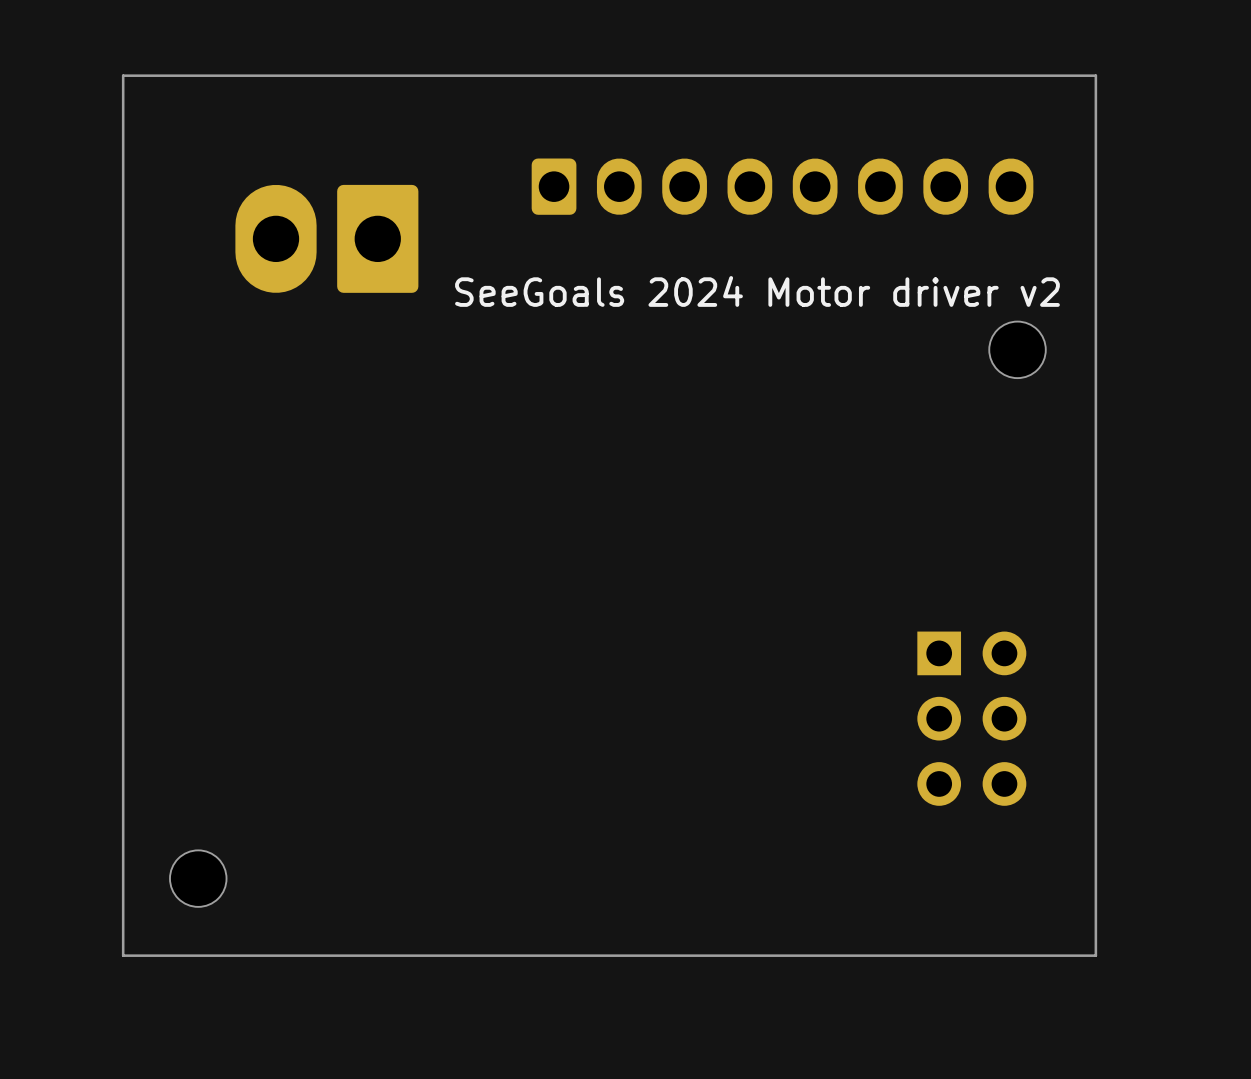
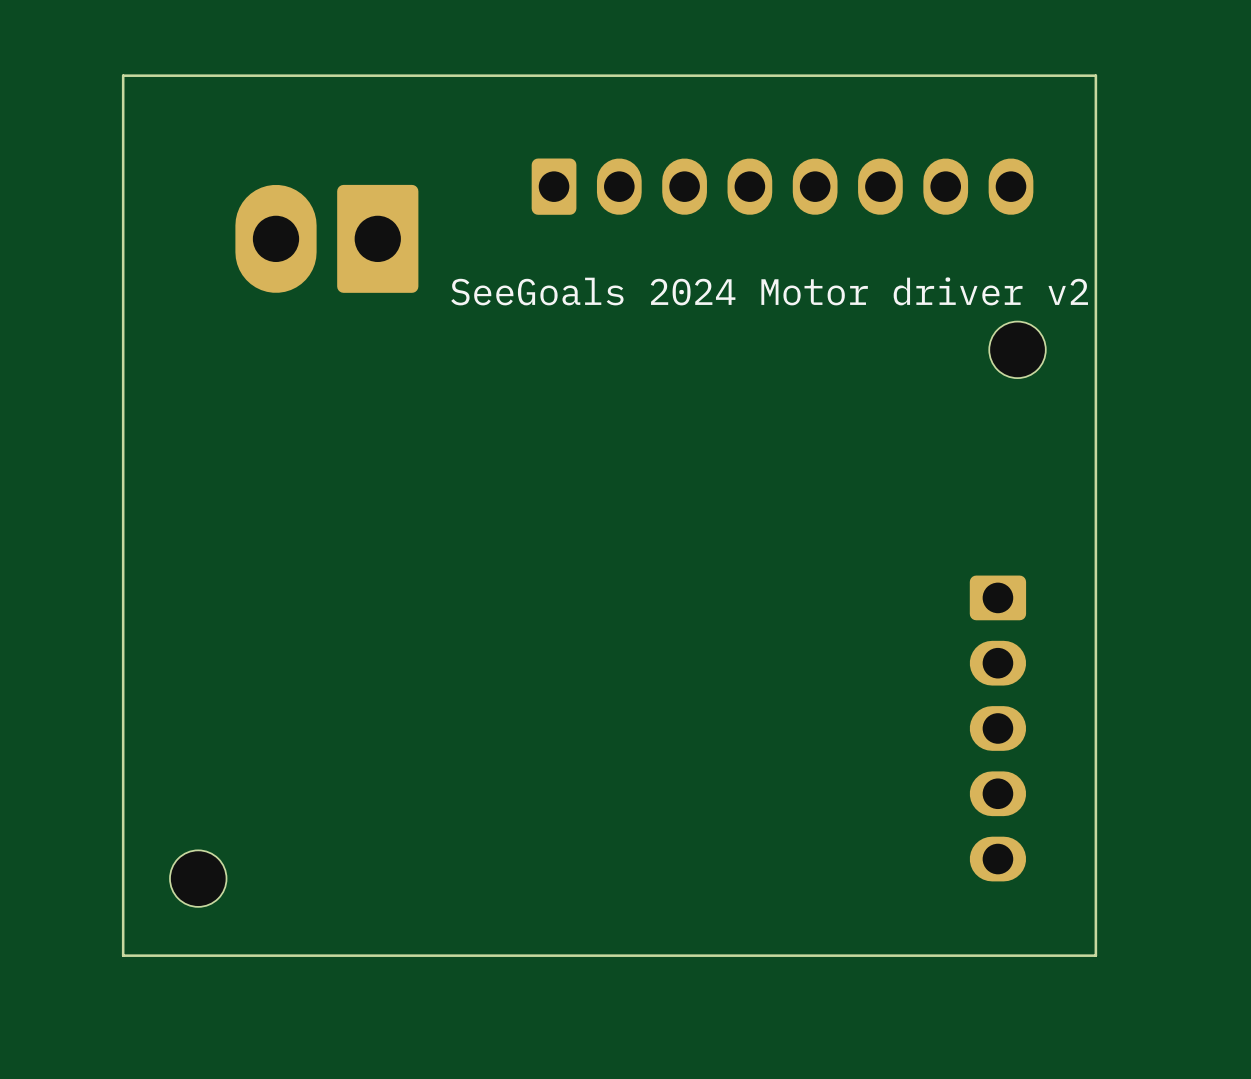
part: (971, 718) -> none
part: none -> (997, 728)

